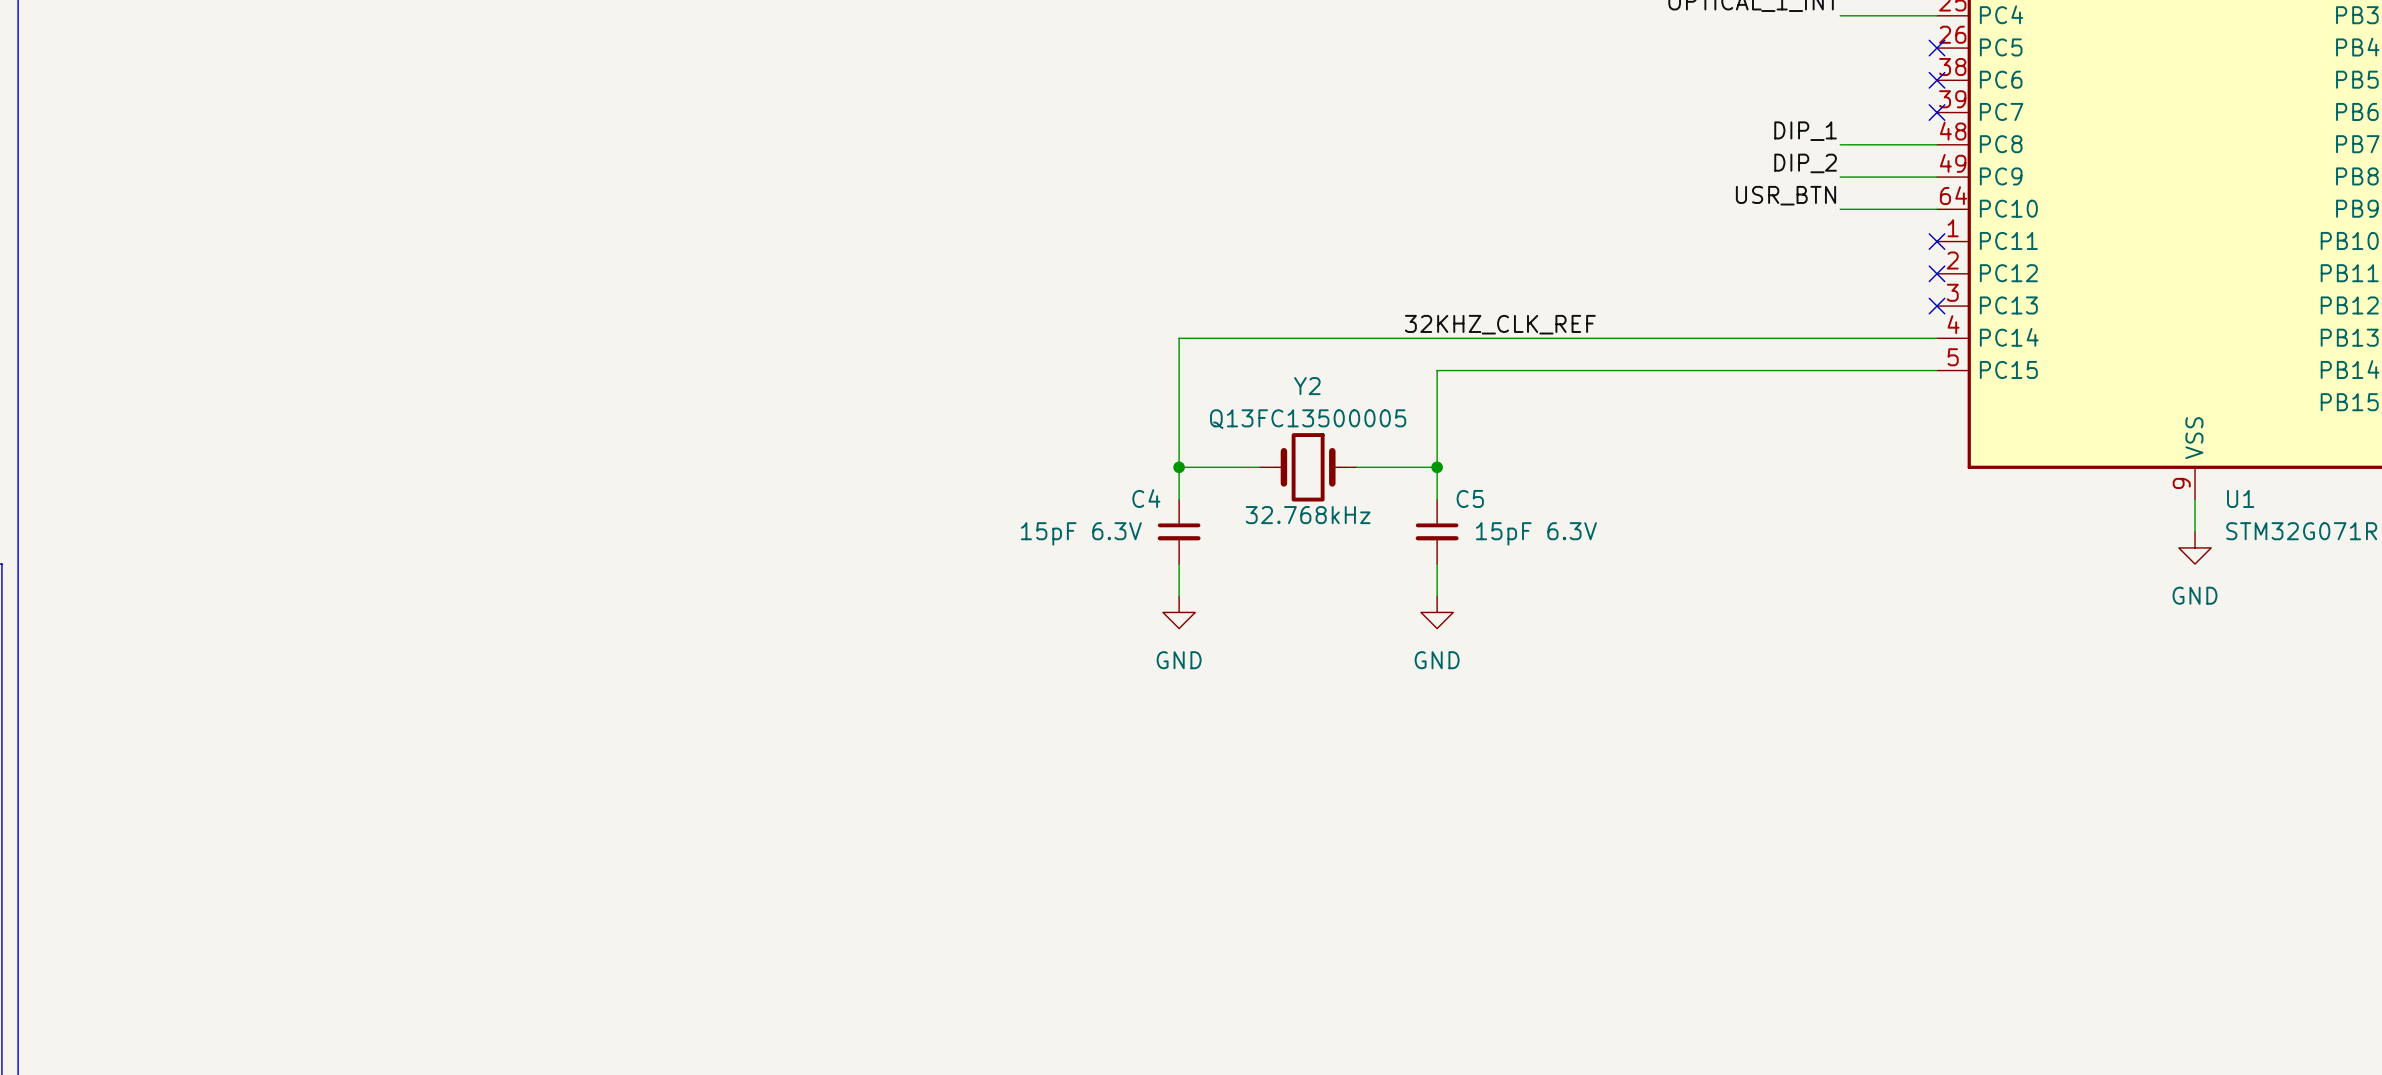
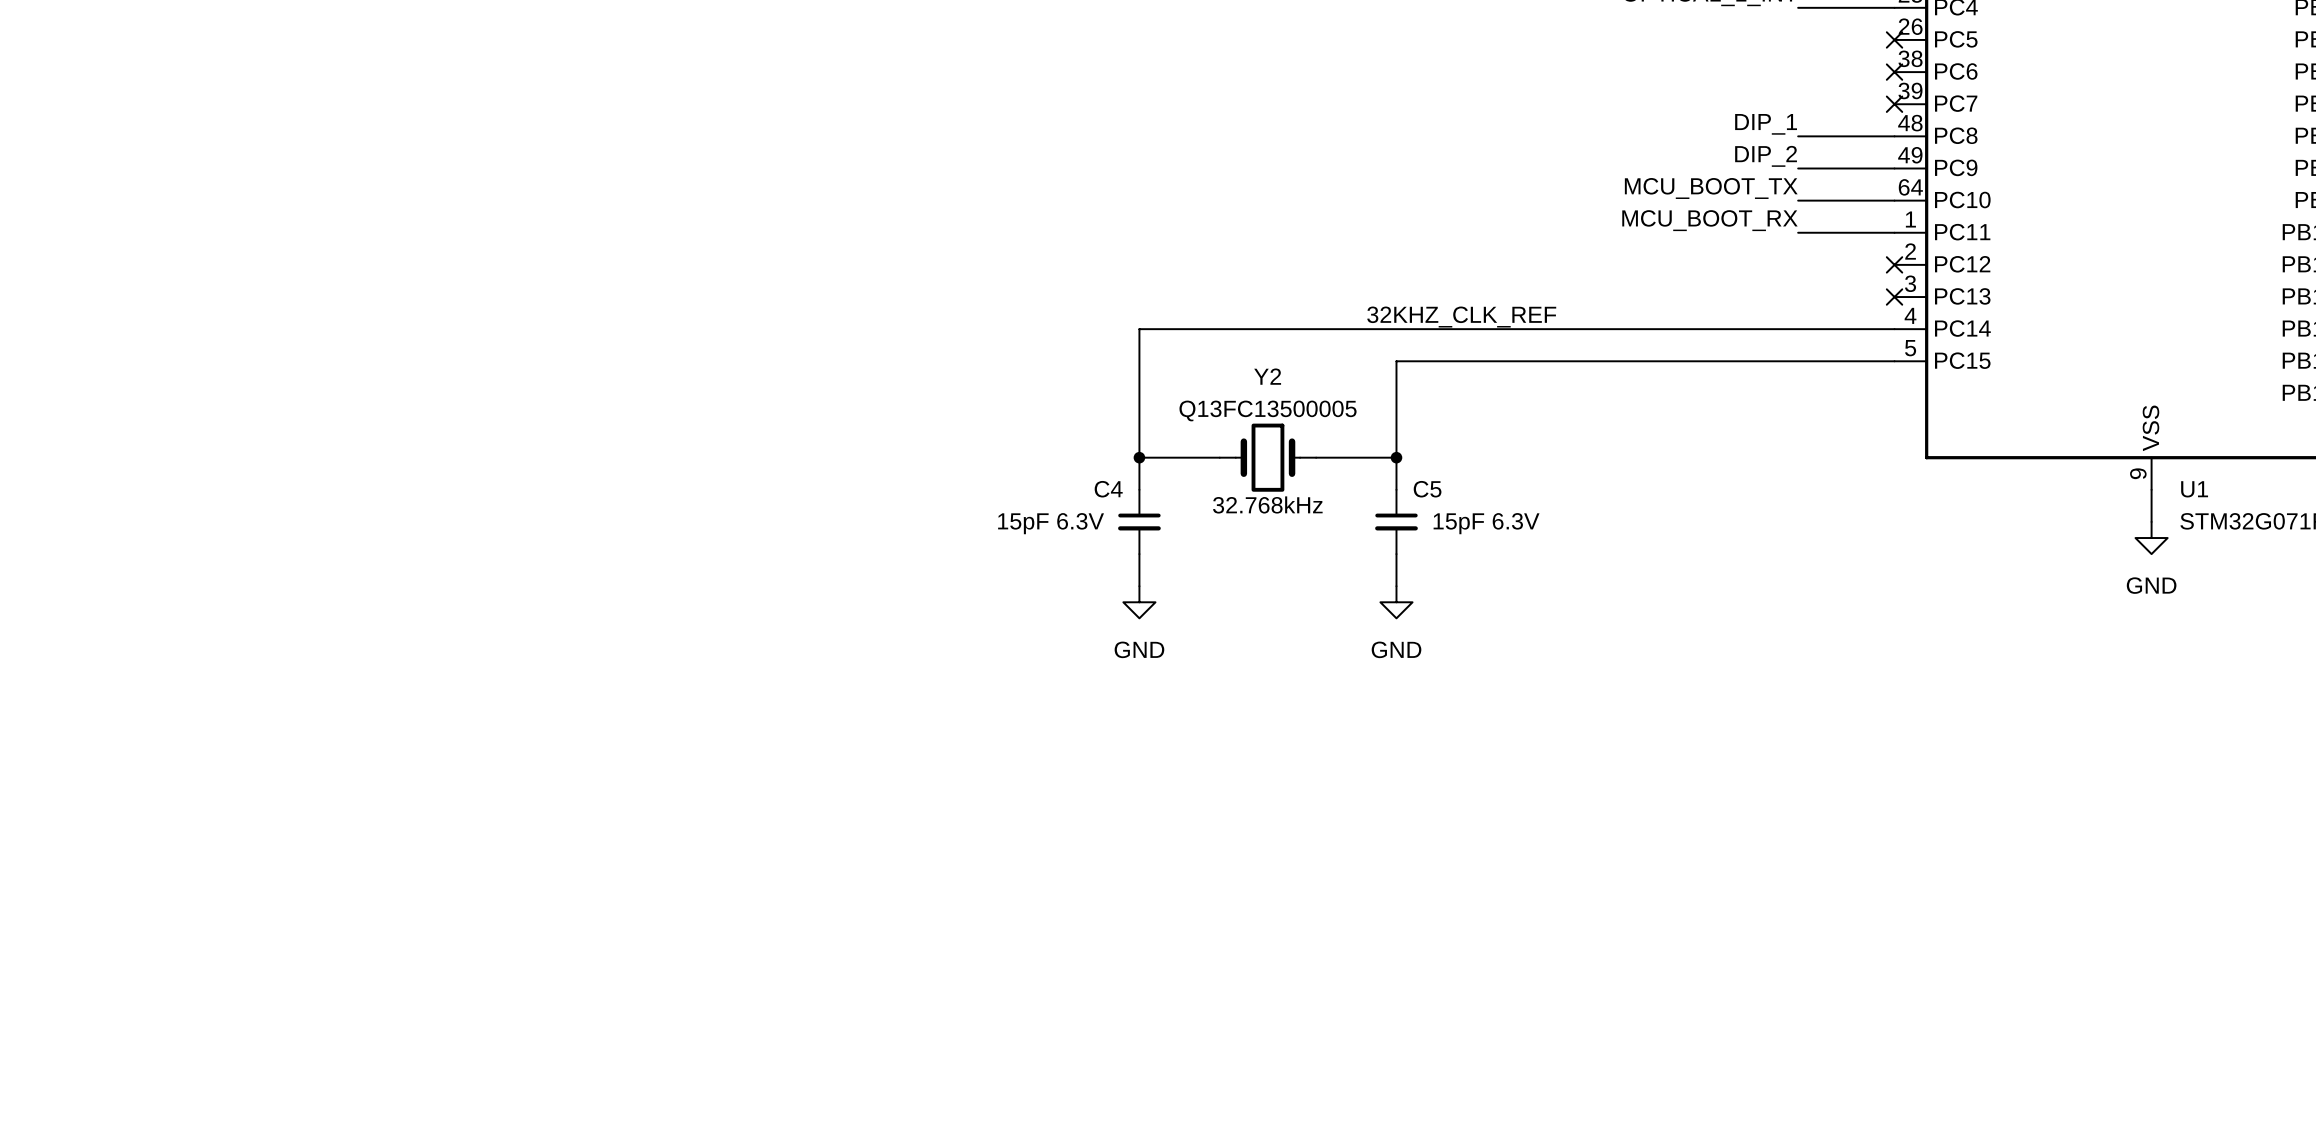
label: USR_BTN (1786, 195) -> MCU_BOOT_TX (1711, 188)
label: none -> MCU_BOOT_RX (1709, 220)
wire: none -> (1798, 232) (1894, 232)
no-connect mark: (1937, 241) -> none

